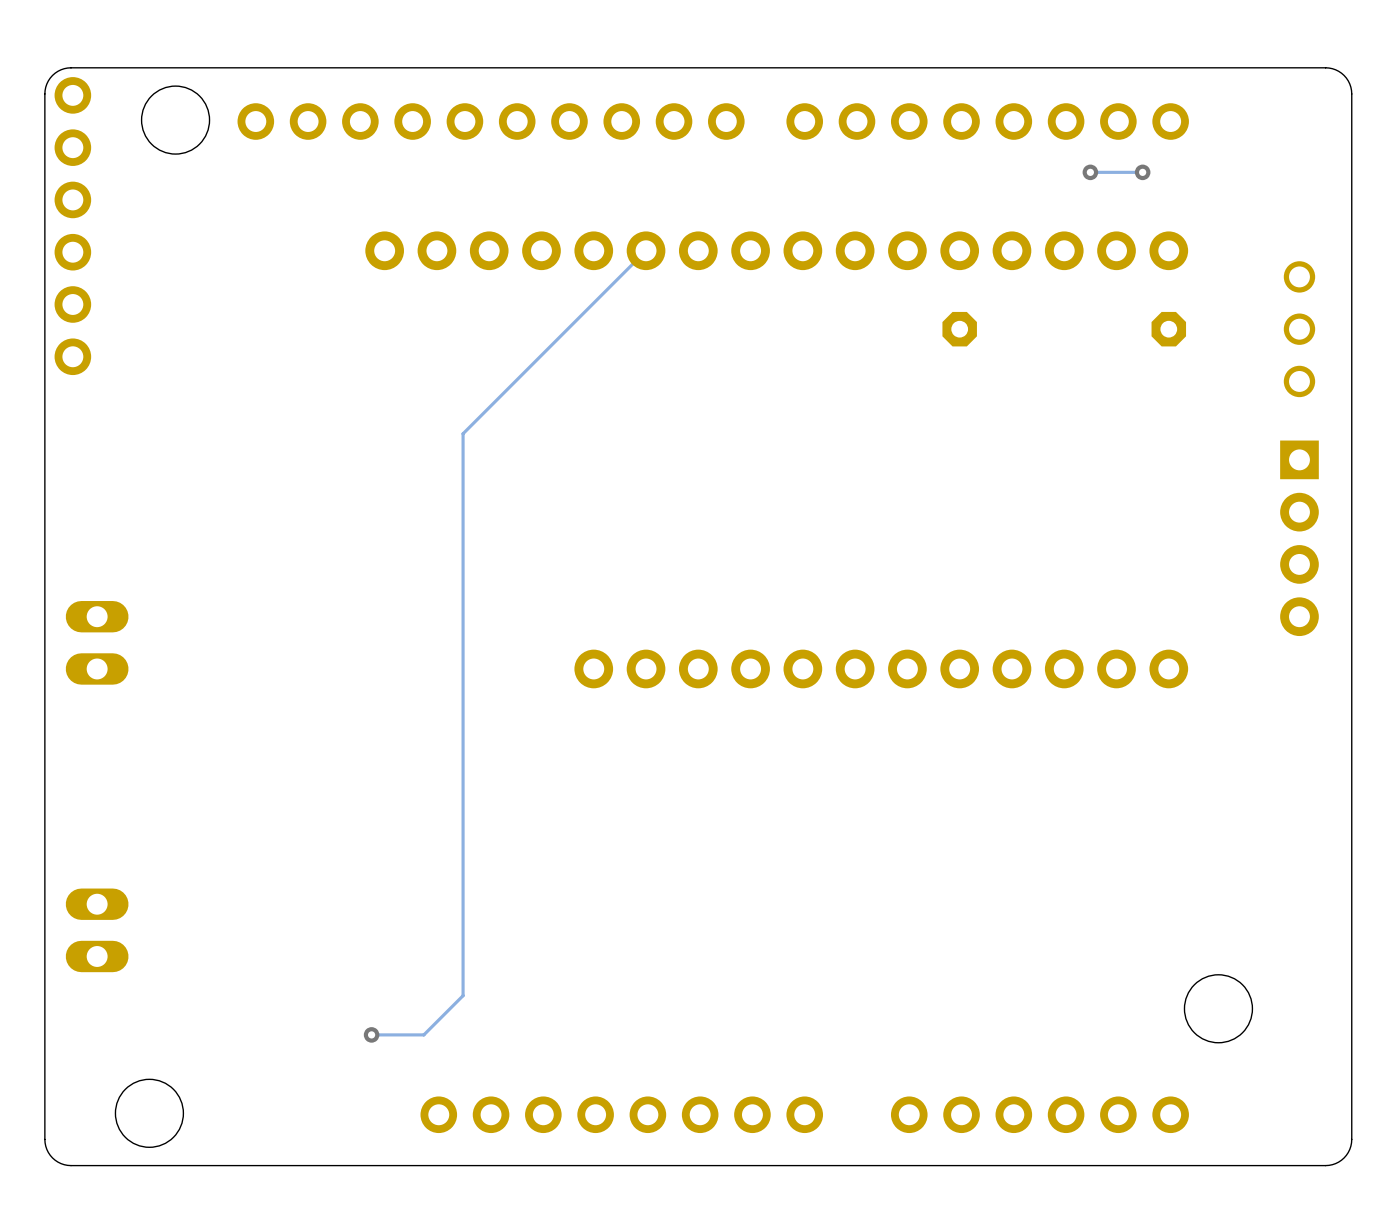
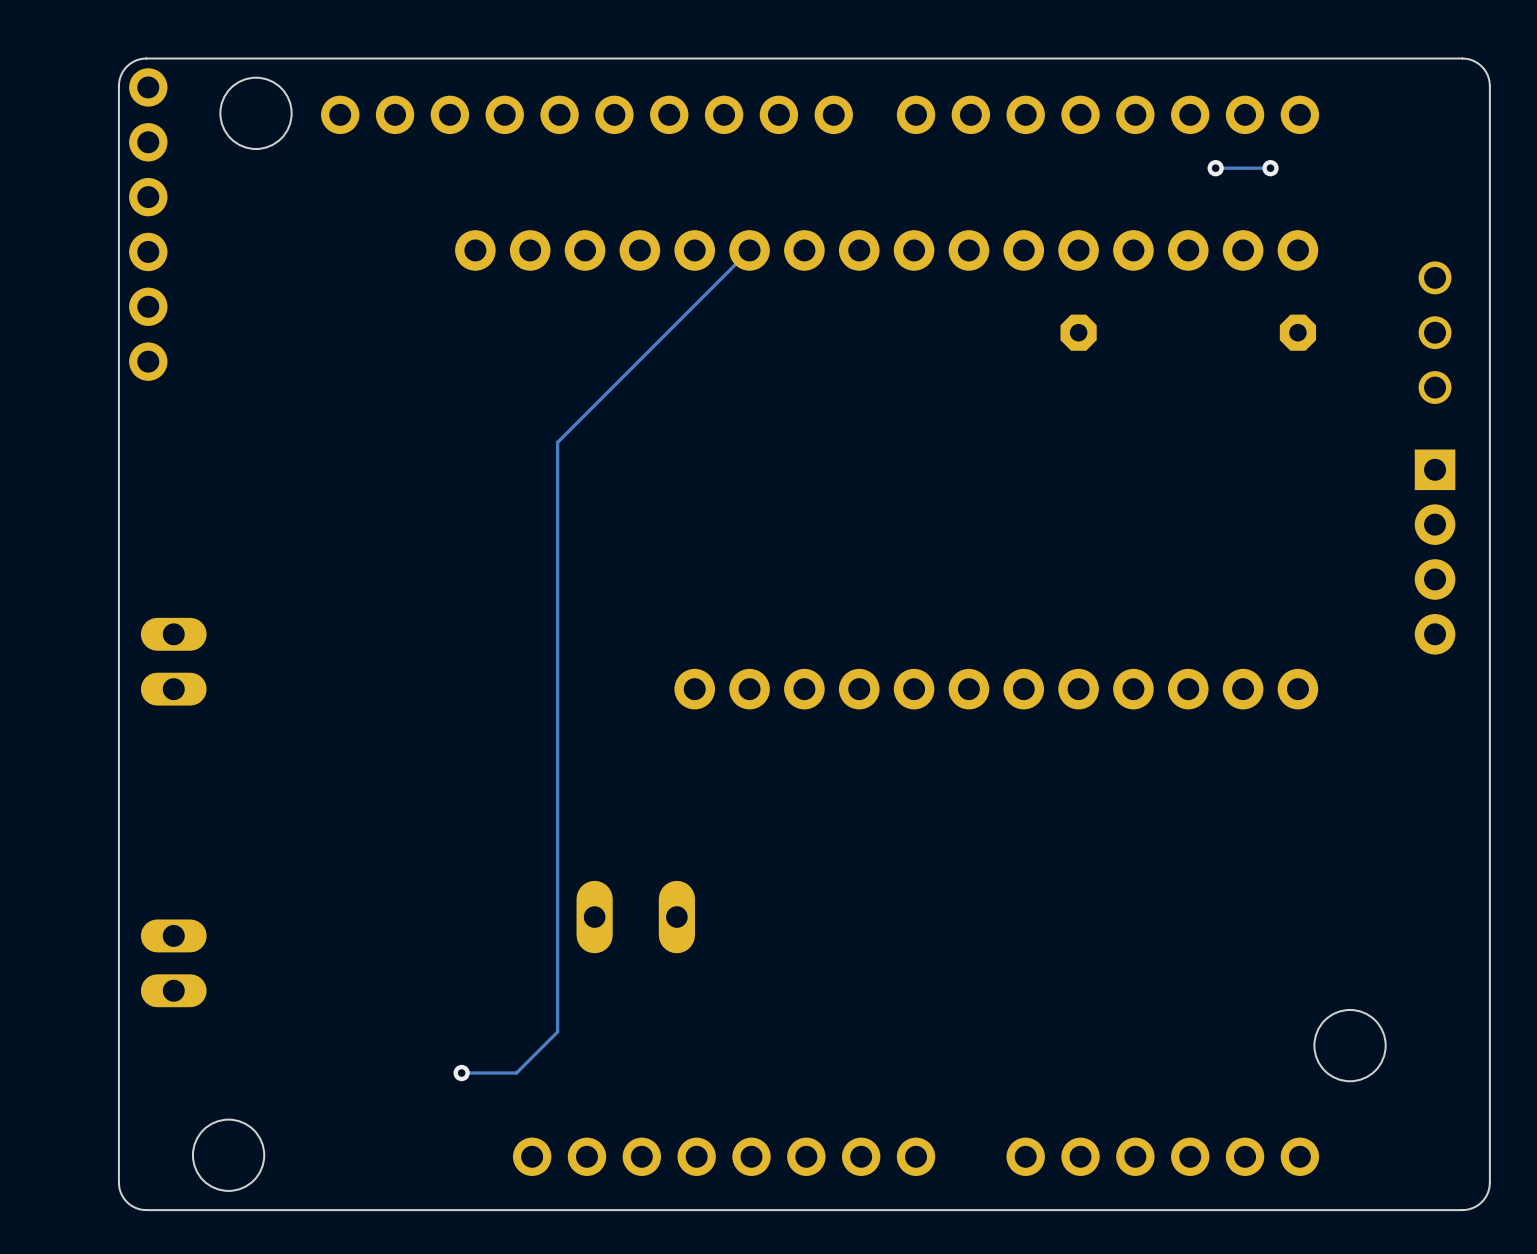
part: none -> (594, 917)
part: none -> (676, 917)

